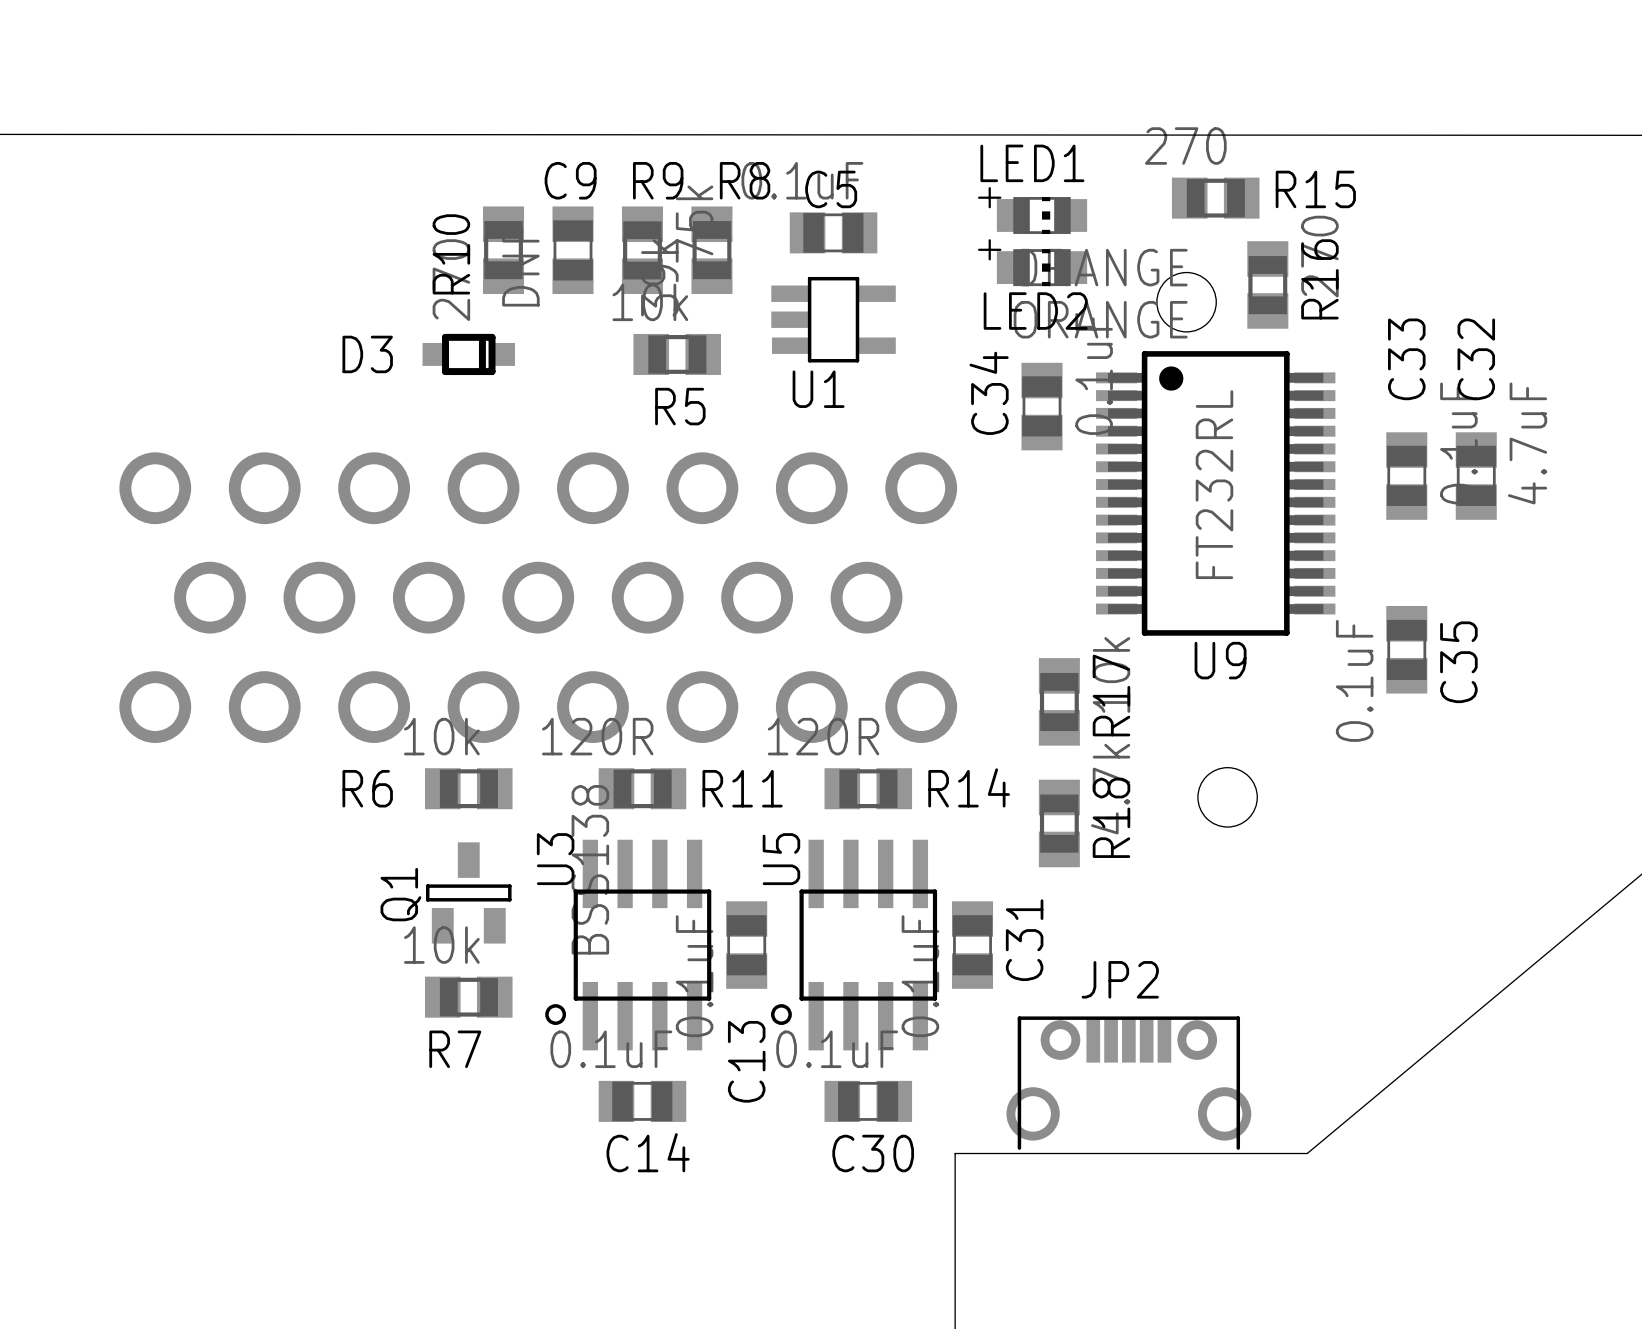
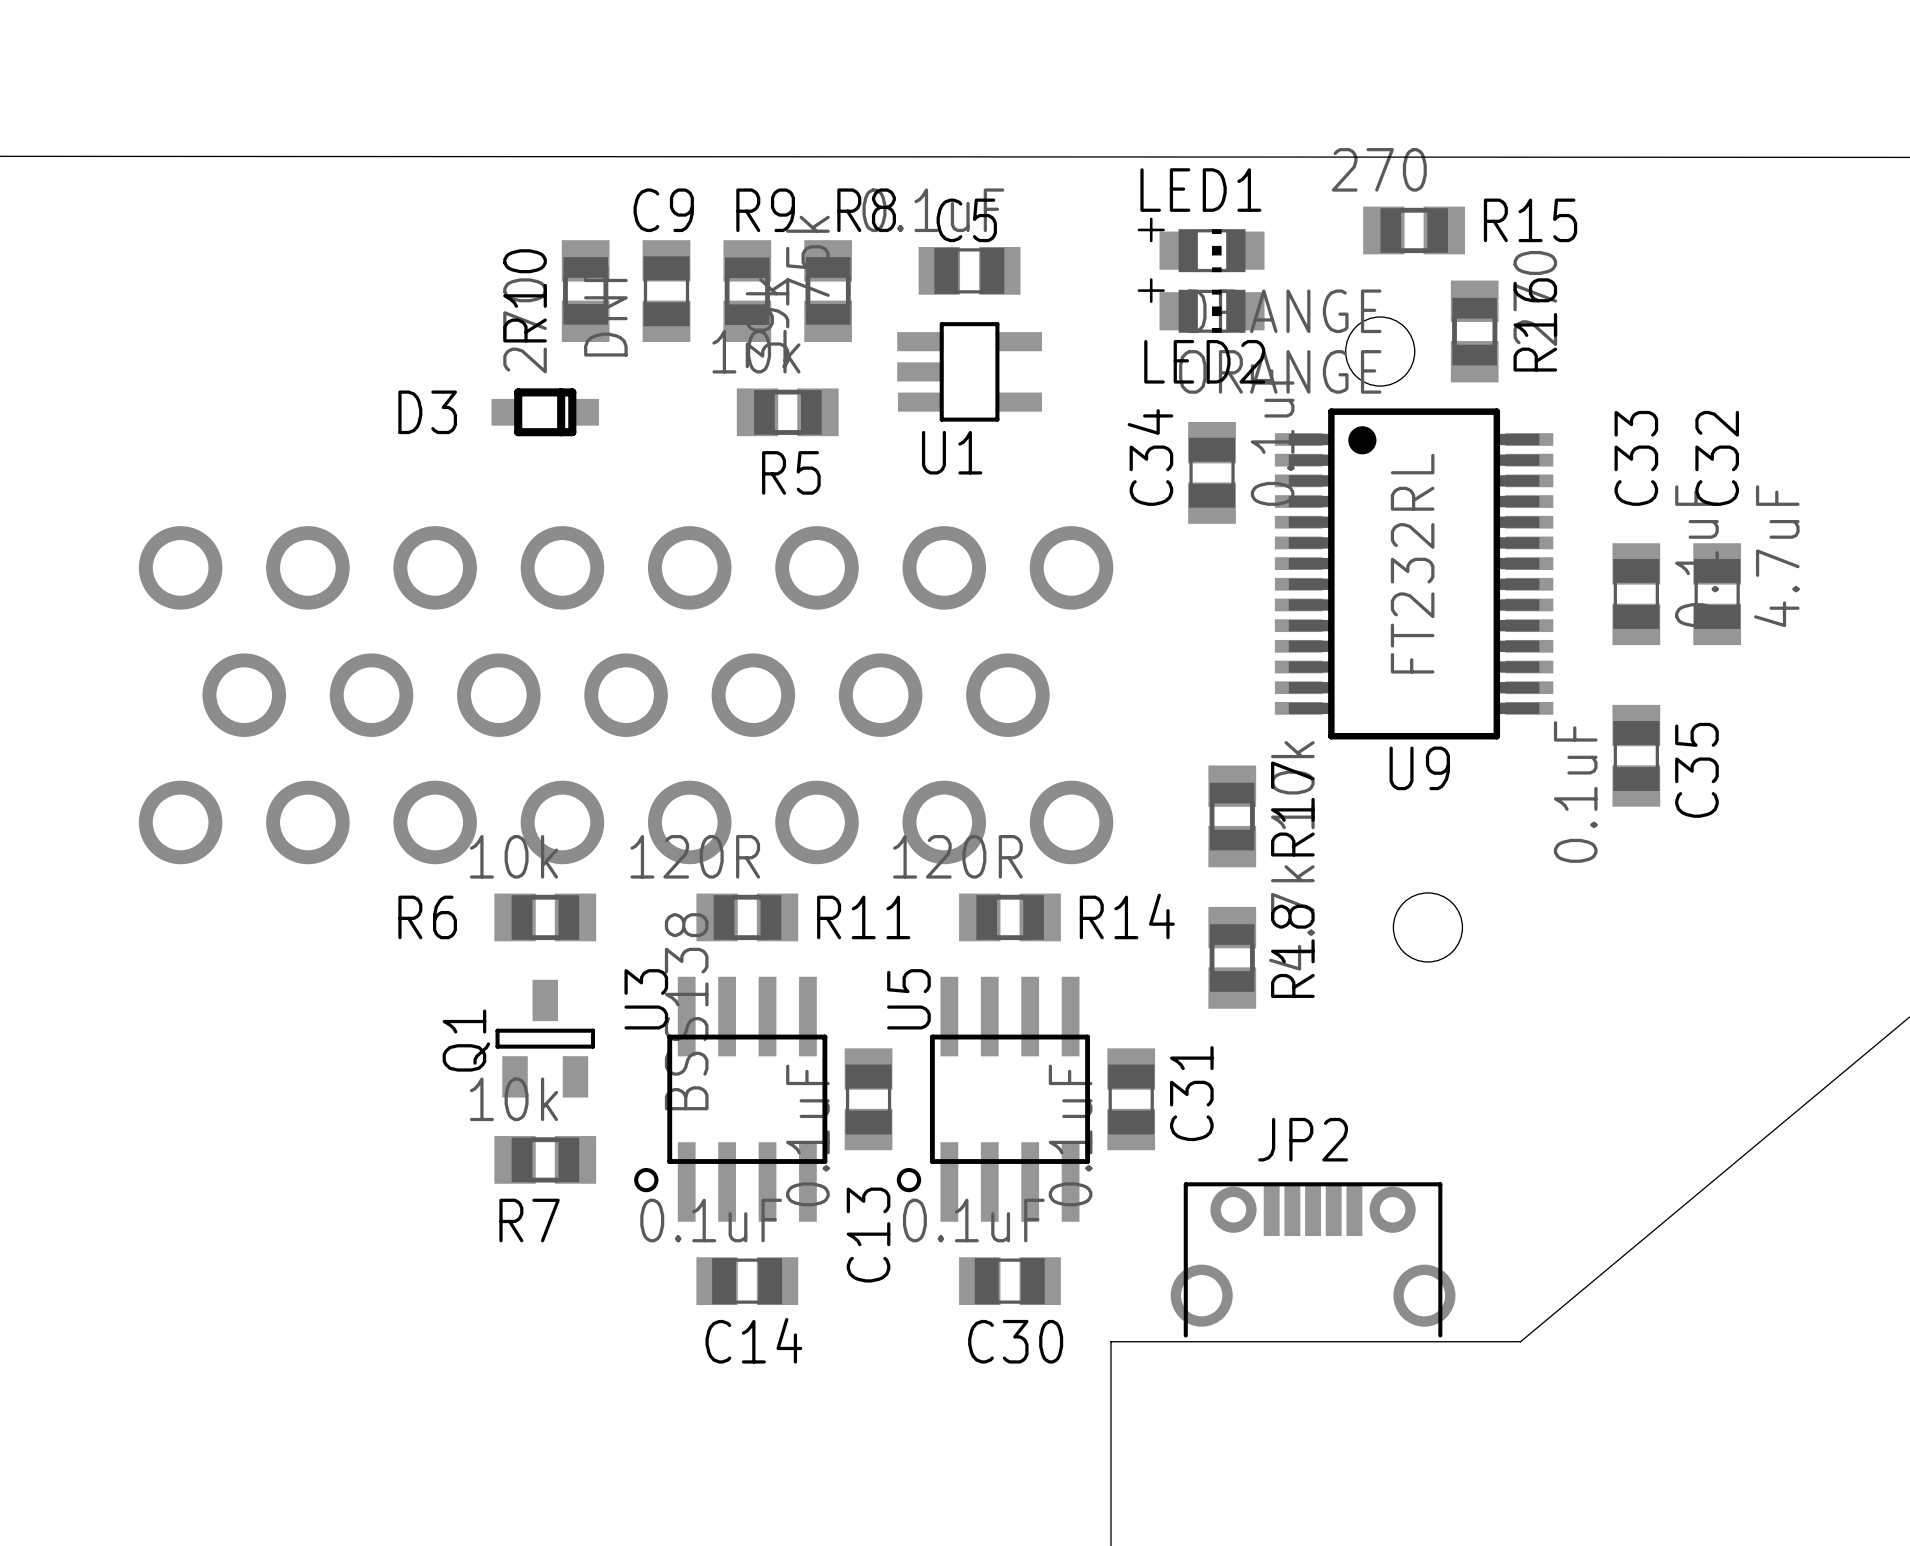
C33 position: (1406, 476) -> (1636, 594)
C32 position: (1476, 476) -> (1717, 594)

